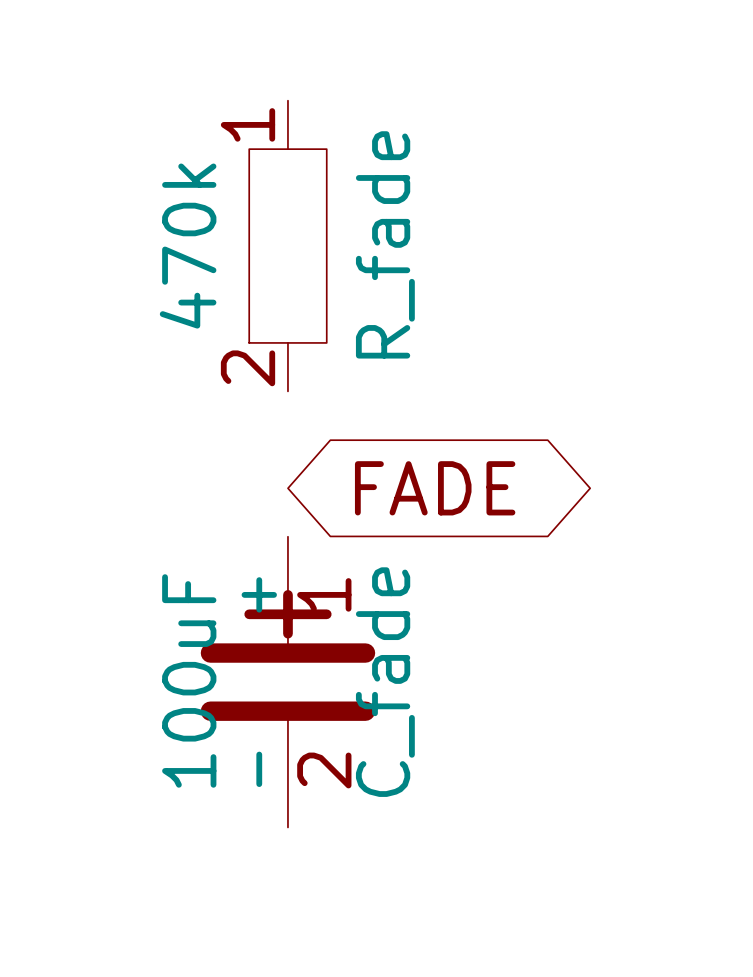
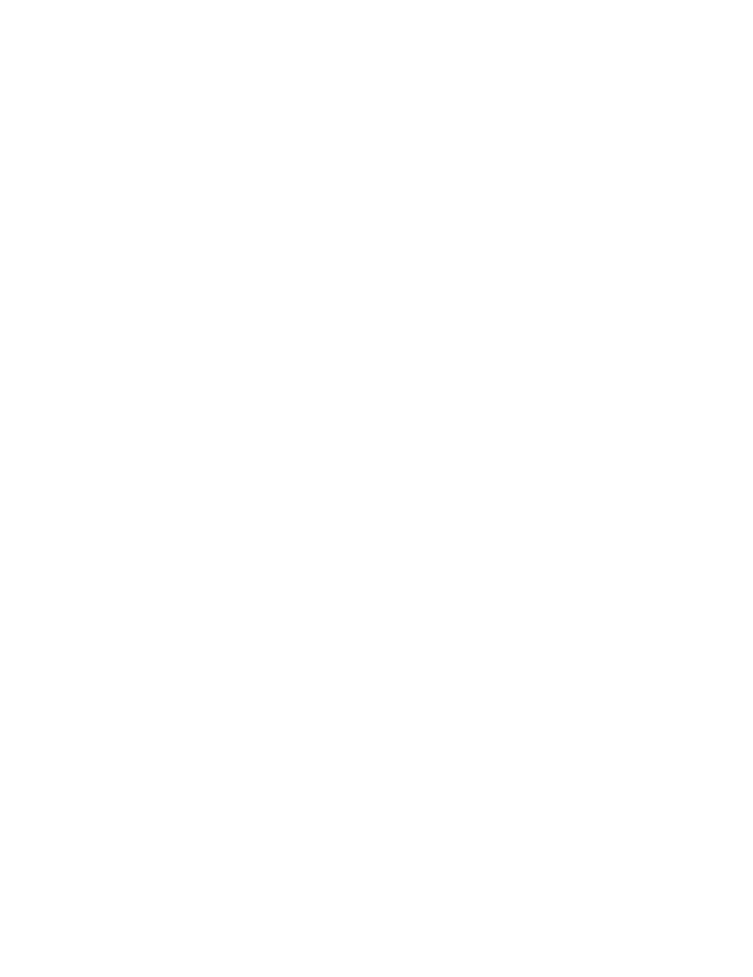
R_fade: 470k (287, 246) -> none
global label: FADE (435, 488) -> none
C_fade: 100uF (287, 682) -> none

